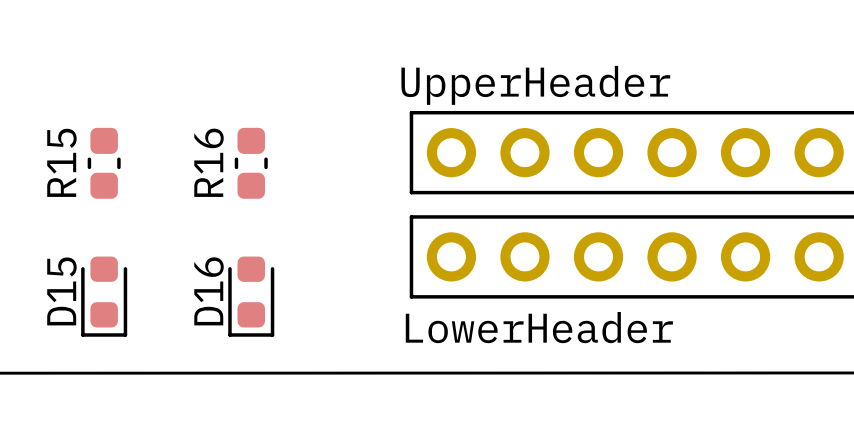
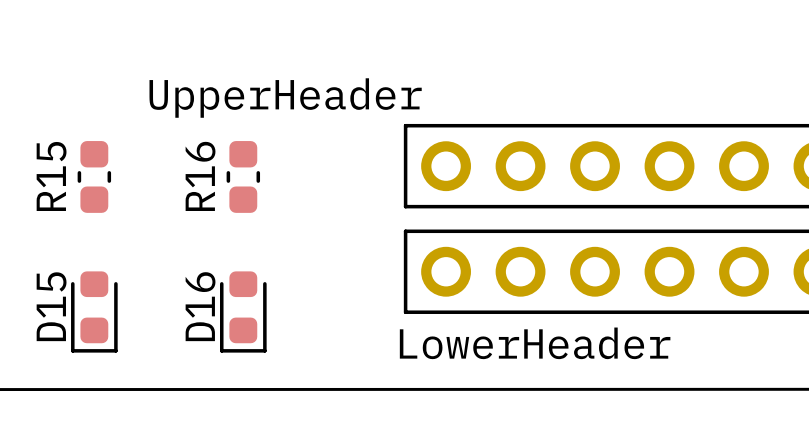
part value position: UpperHeader (535, 85) -> UpperHeader (285, 98)

